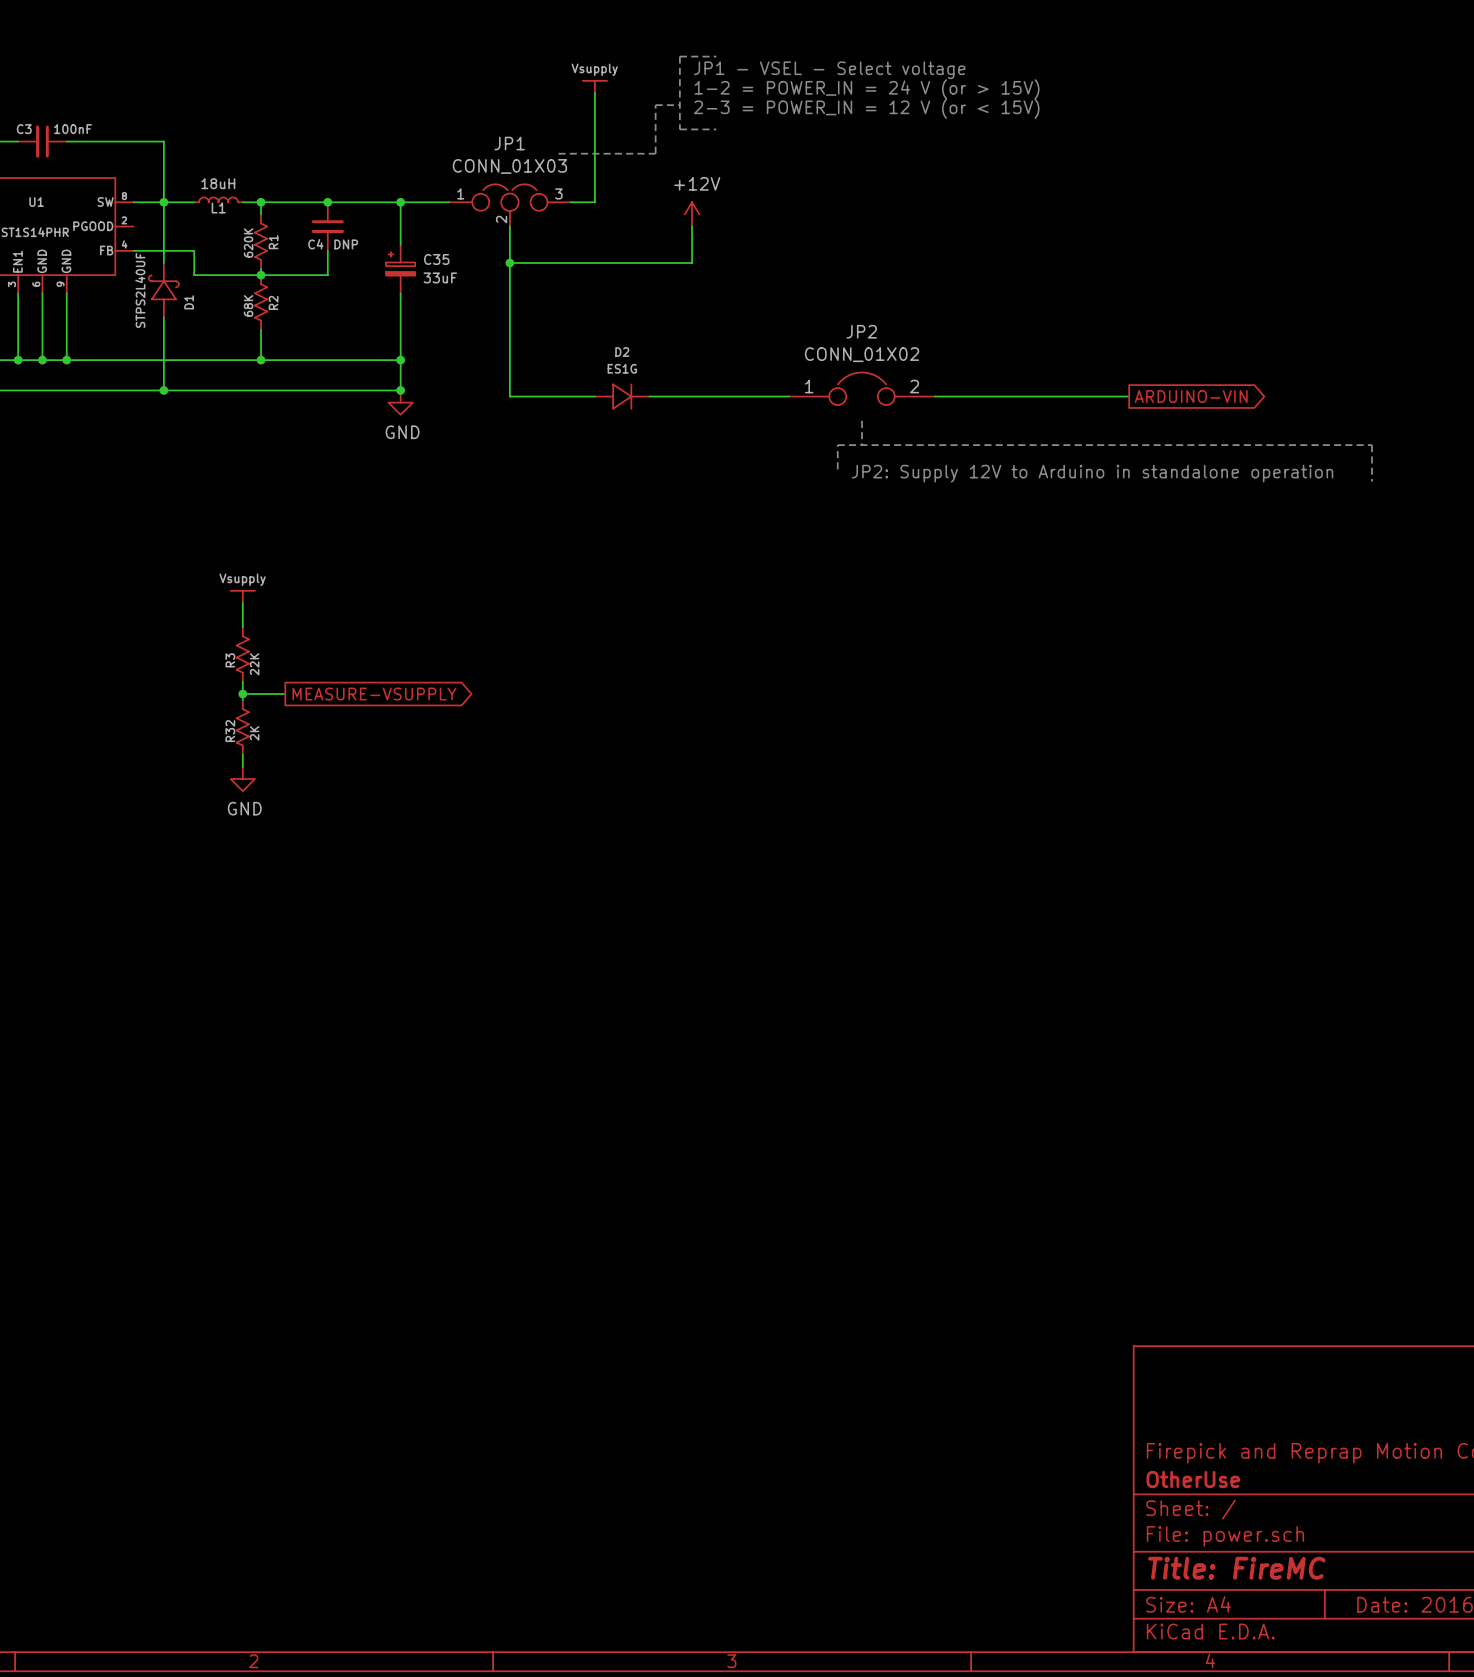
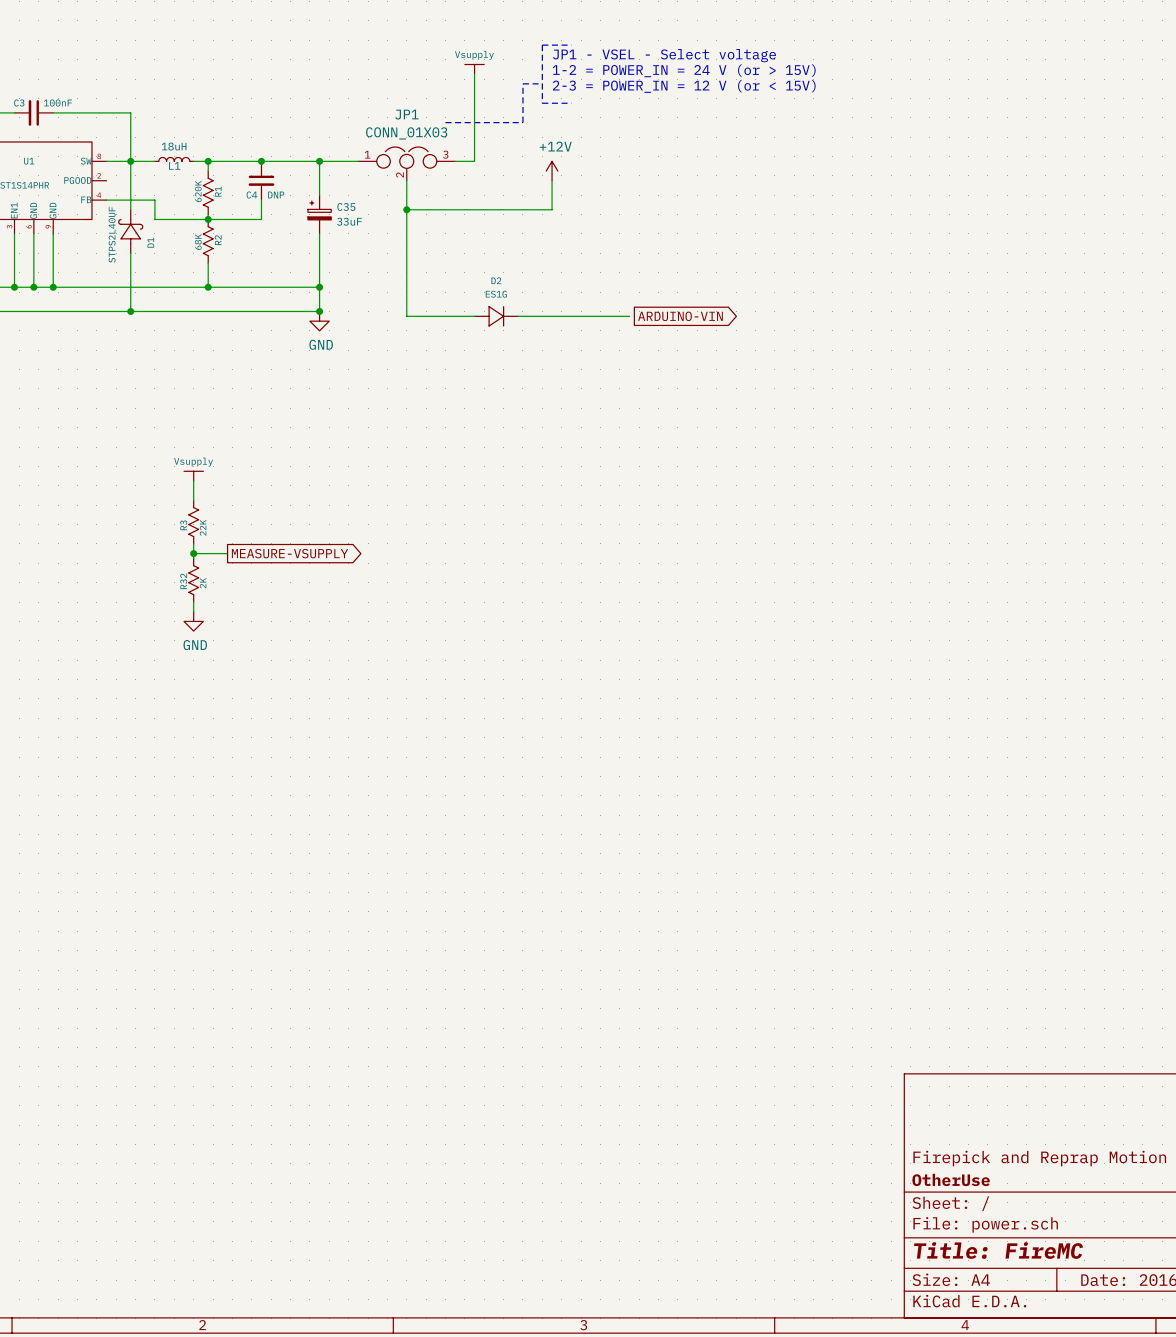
JP2: CONN_01X02 (862, 388) -> none
global label: none -> ARDUINO-VIN (680, 316)
wire: (934, 396) (1129, 396) -> none
global label: ARDUINO-VIN (1191, 396) -> none
line: (862, 420) (862, 445) -> none
line: (837, 469) (837, 445) (1371, 445) (1371, 481) -> none
text: JP2: Supply 12V to Arduino in standalone operation (1092, 473) -> none

